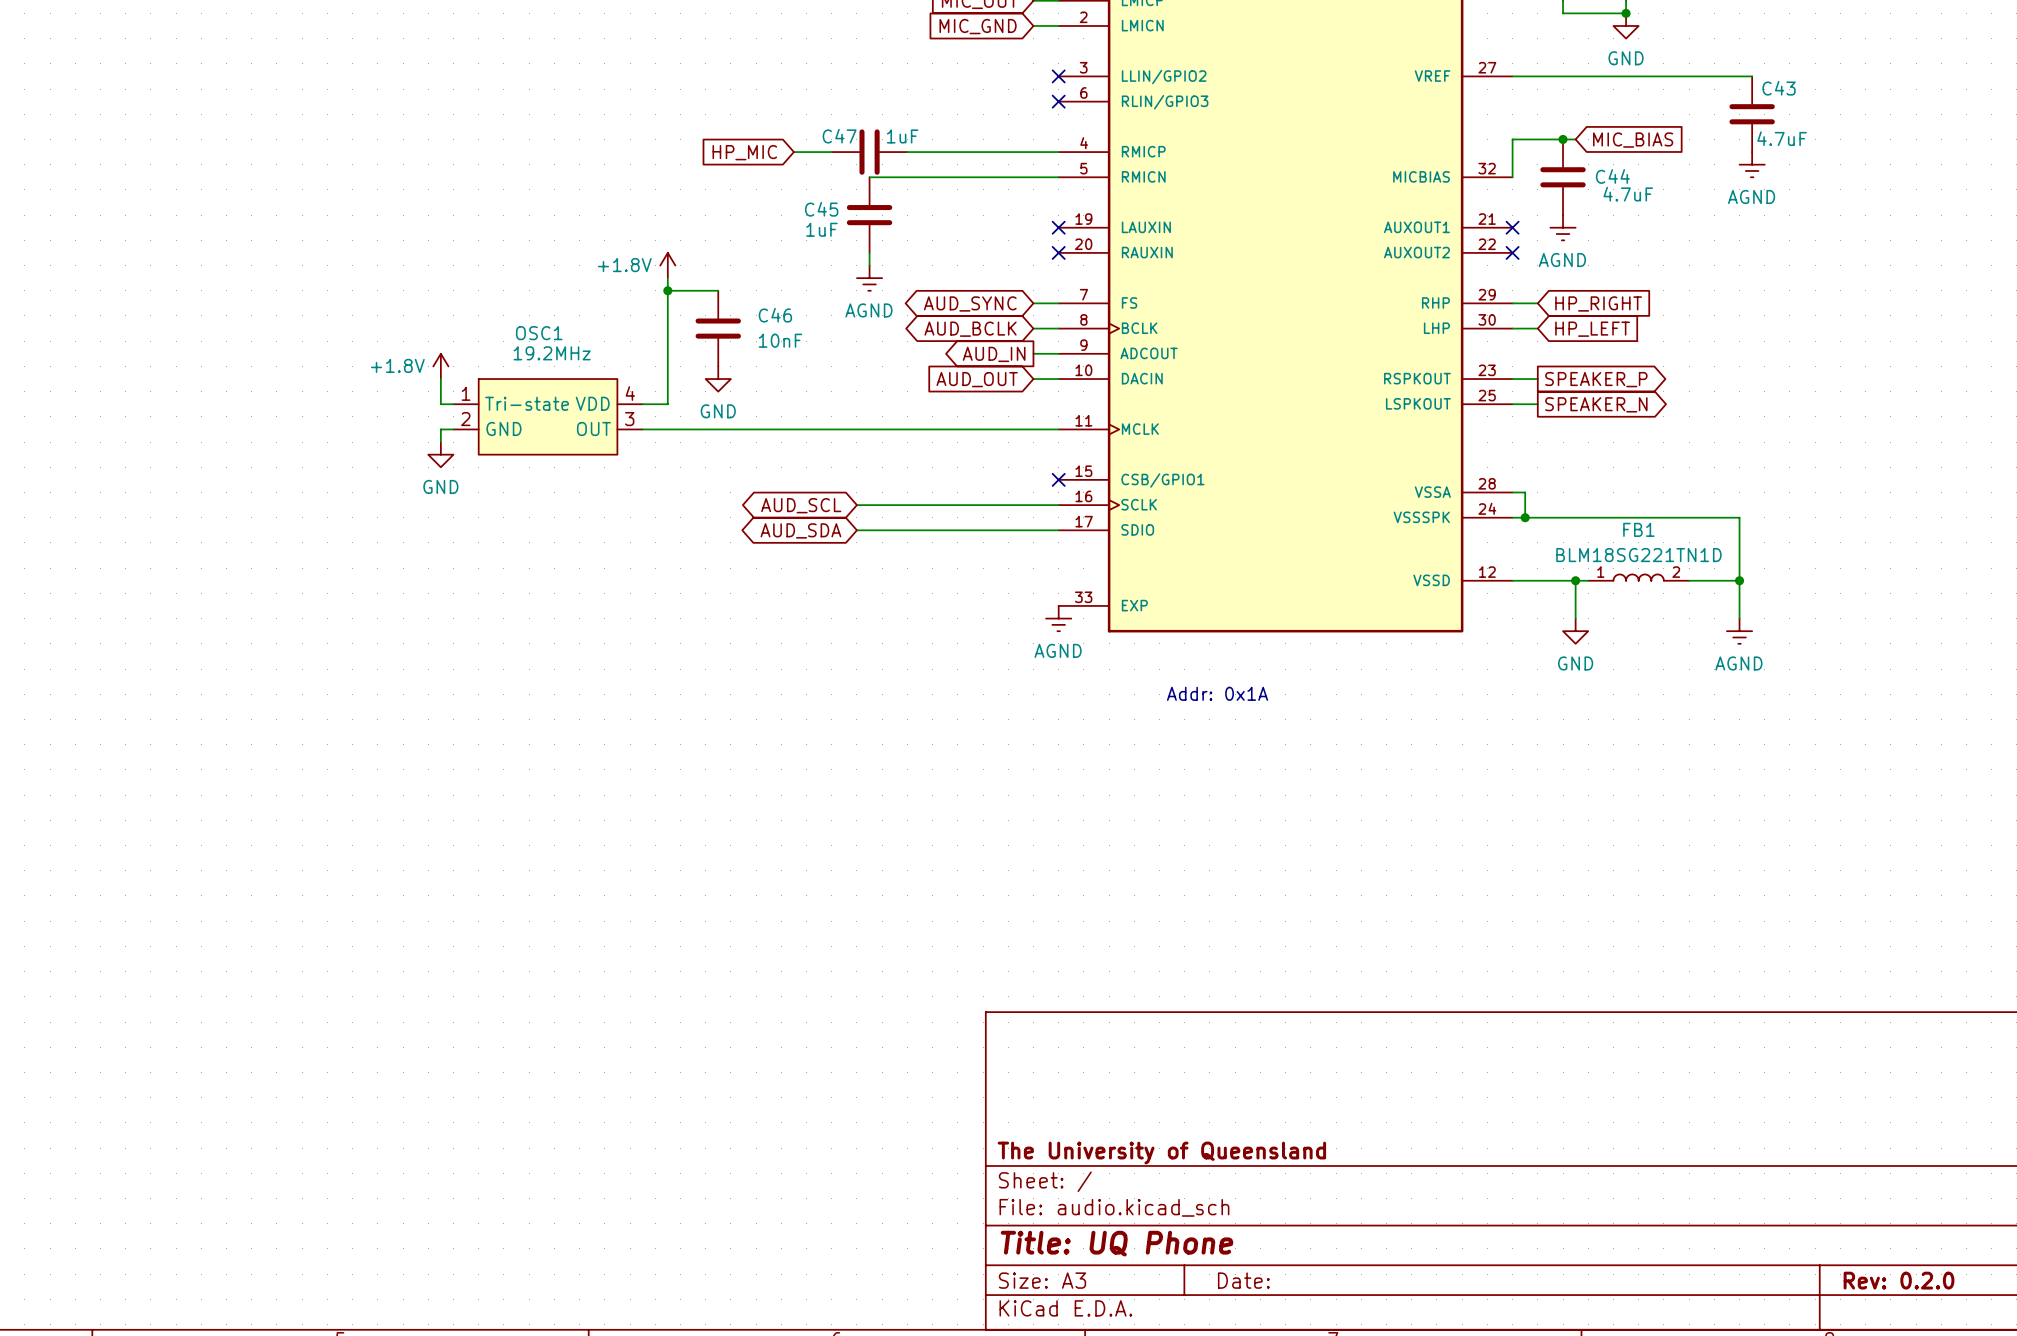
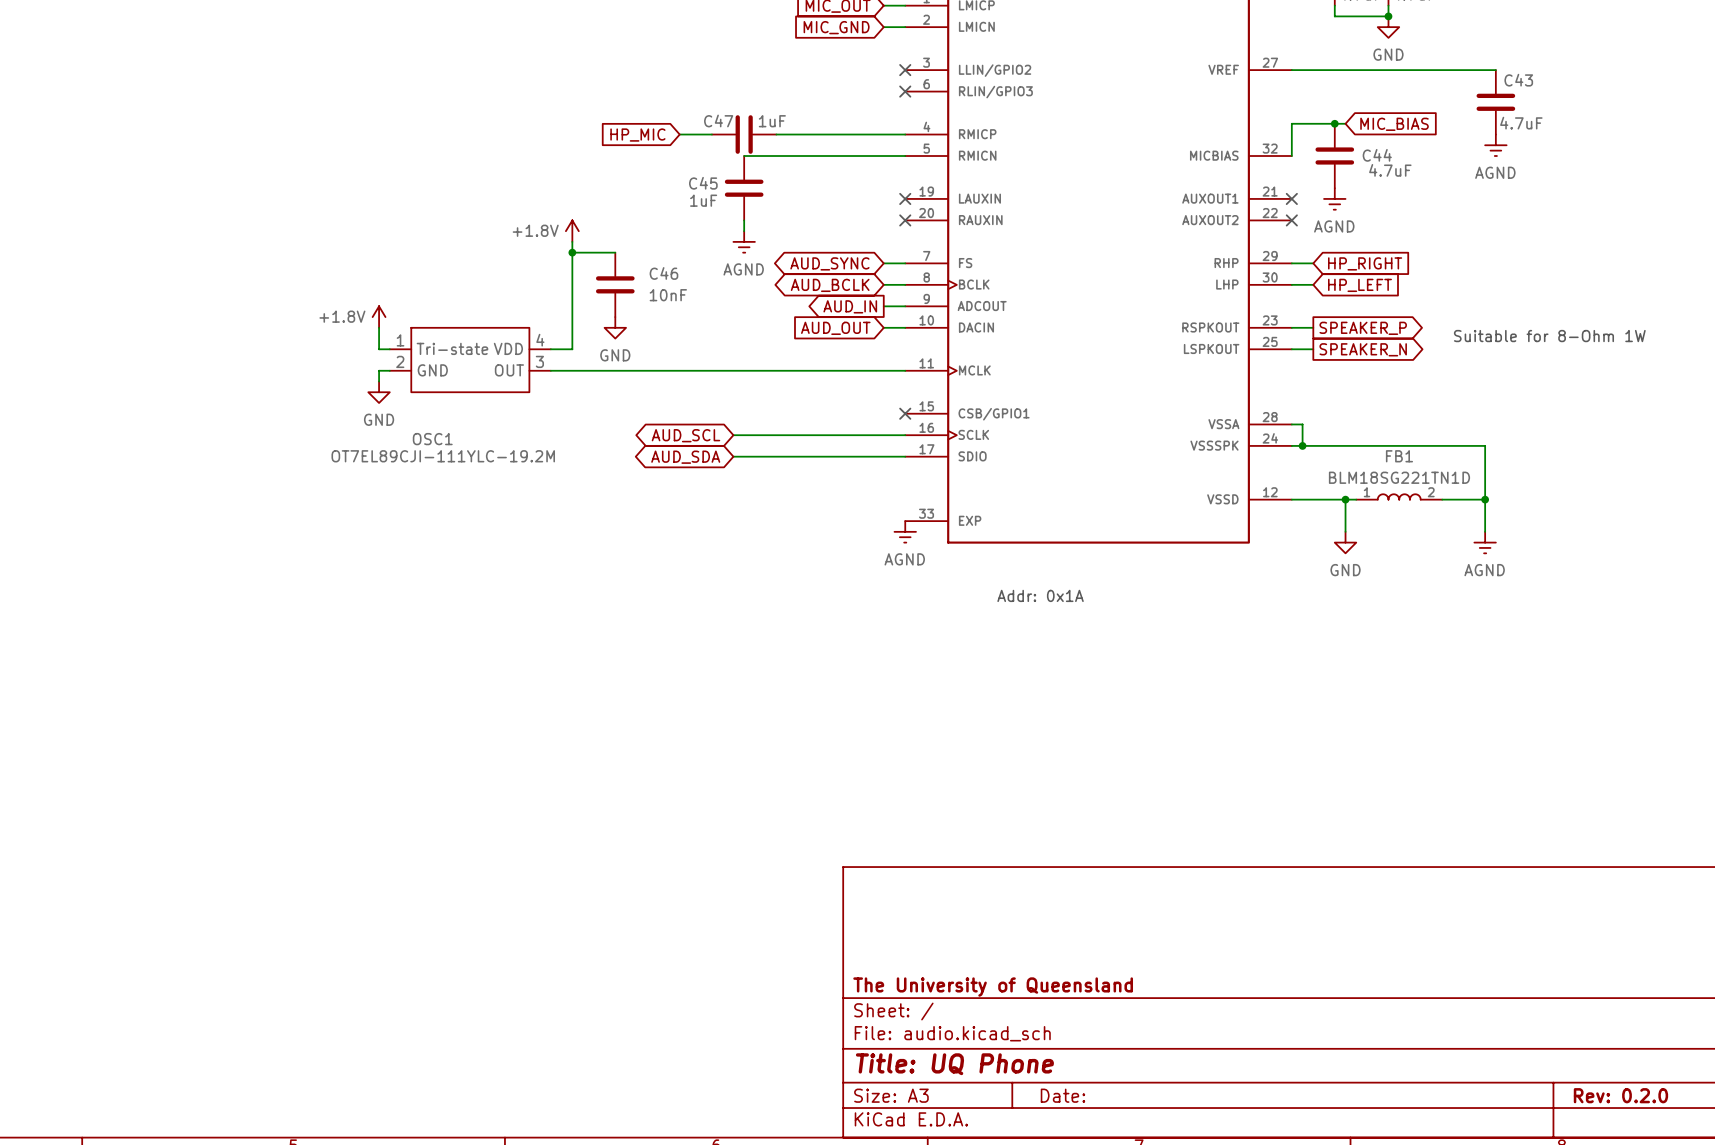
OSC1 name position: OSC1 (539, 333) -> OSC1 (432, 439)
OSC1 value: 19.2MHz (552, 353) -> OT7EL89CJI-111YLC-19.2M (443, 456)
text: none -> Suitable for 8-Ohm 1W (1549, 336)

